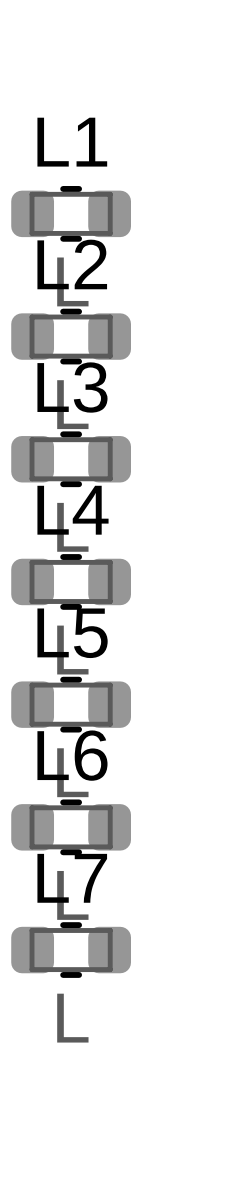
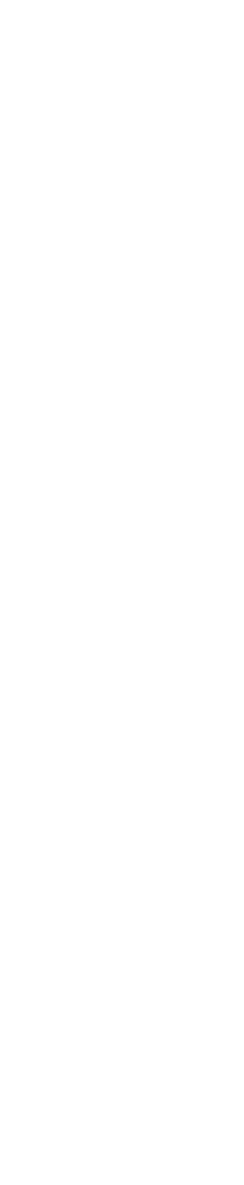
L1: L (71, 213) -> none
L2: L (71, 336) -> none
L3: L (71, 459) -> none
L4: L (71, 581) -> none
L5: L (71, 704) -> none
L6: L (71, 827) -> none
L7: L (71, 950) -> none

